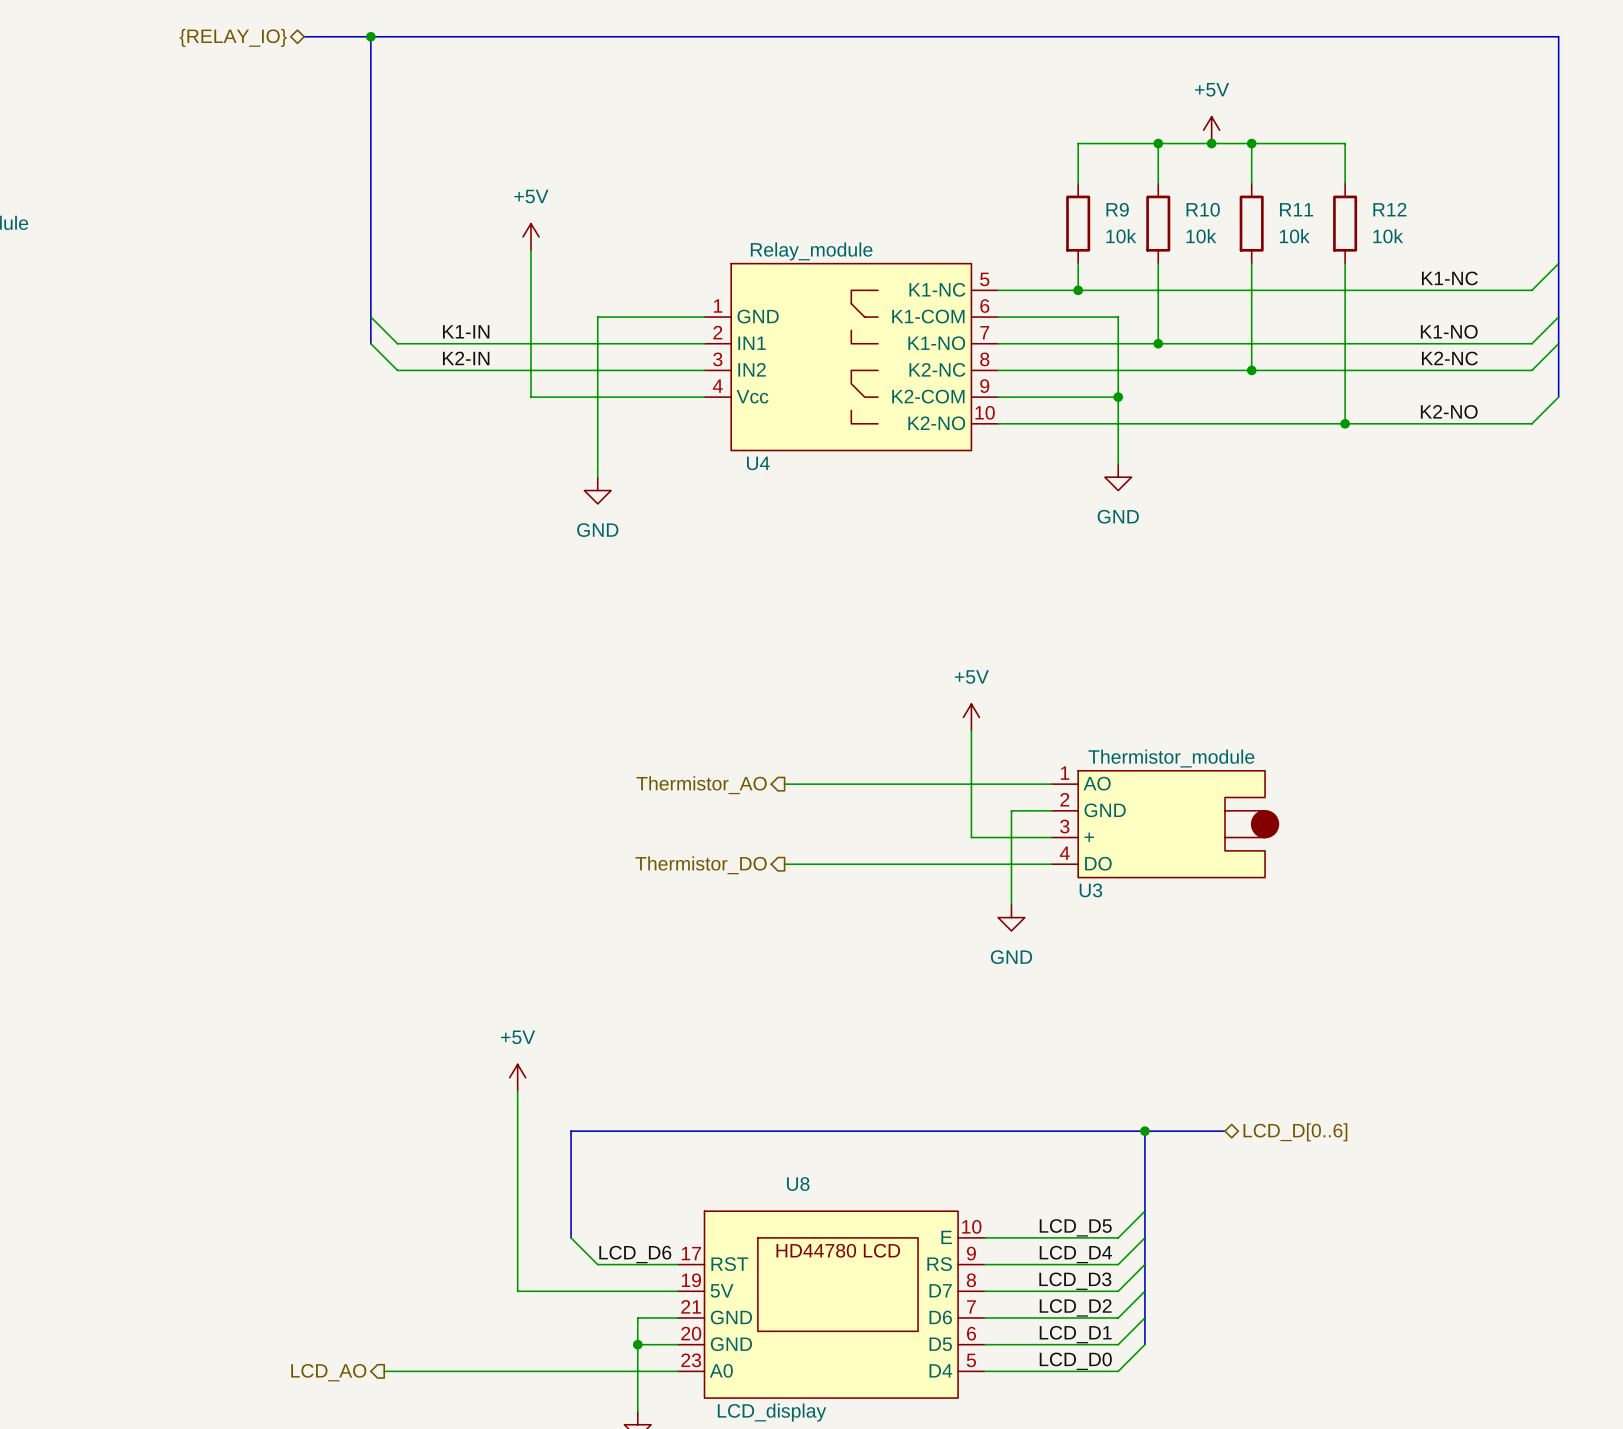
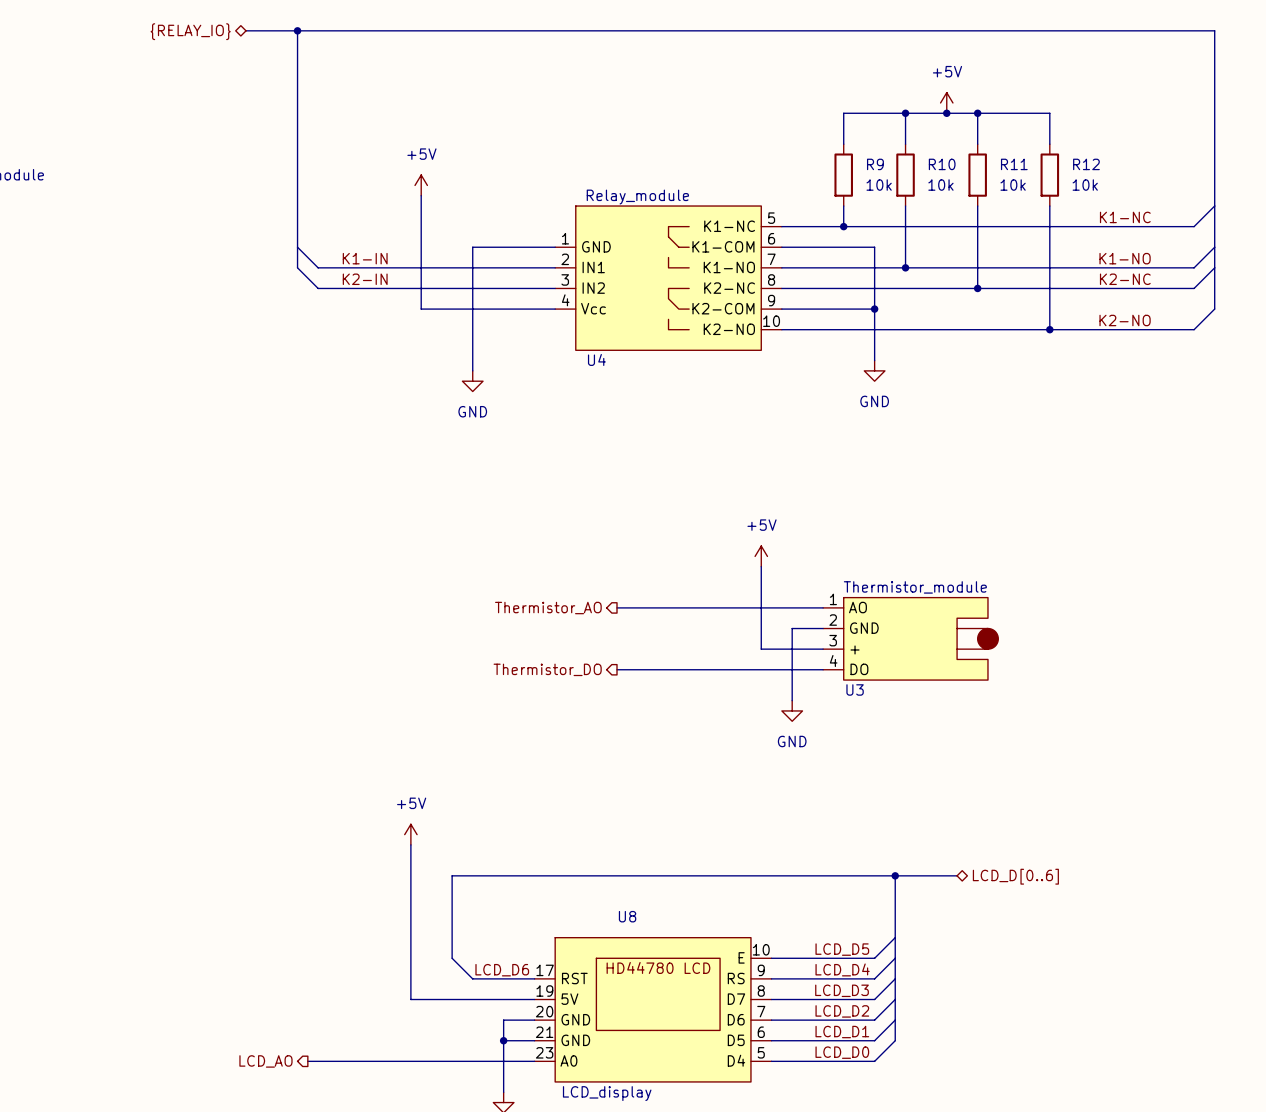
U8 pin number: 21 (691, 1306) -> 20 (544, 1011)
U8 pin number: 20 (691, 1333) -> 21 (544, 1032)

